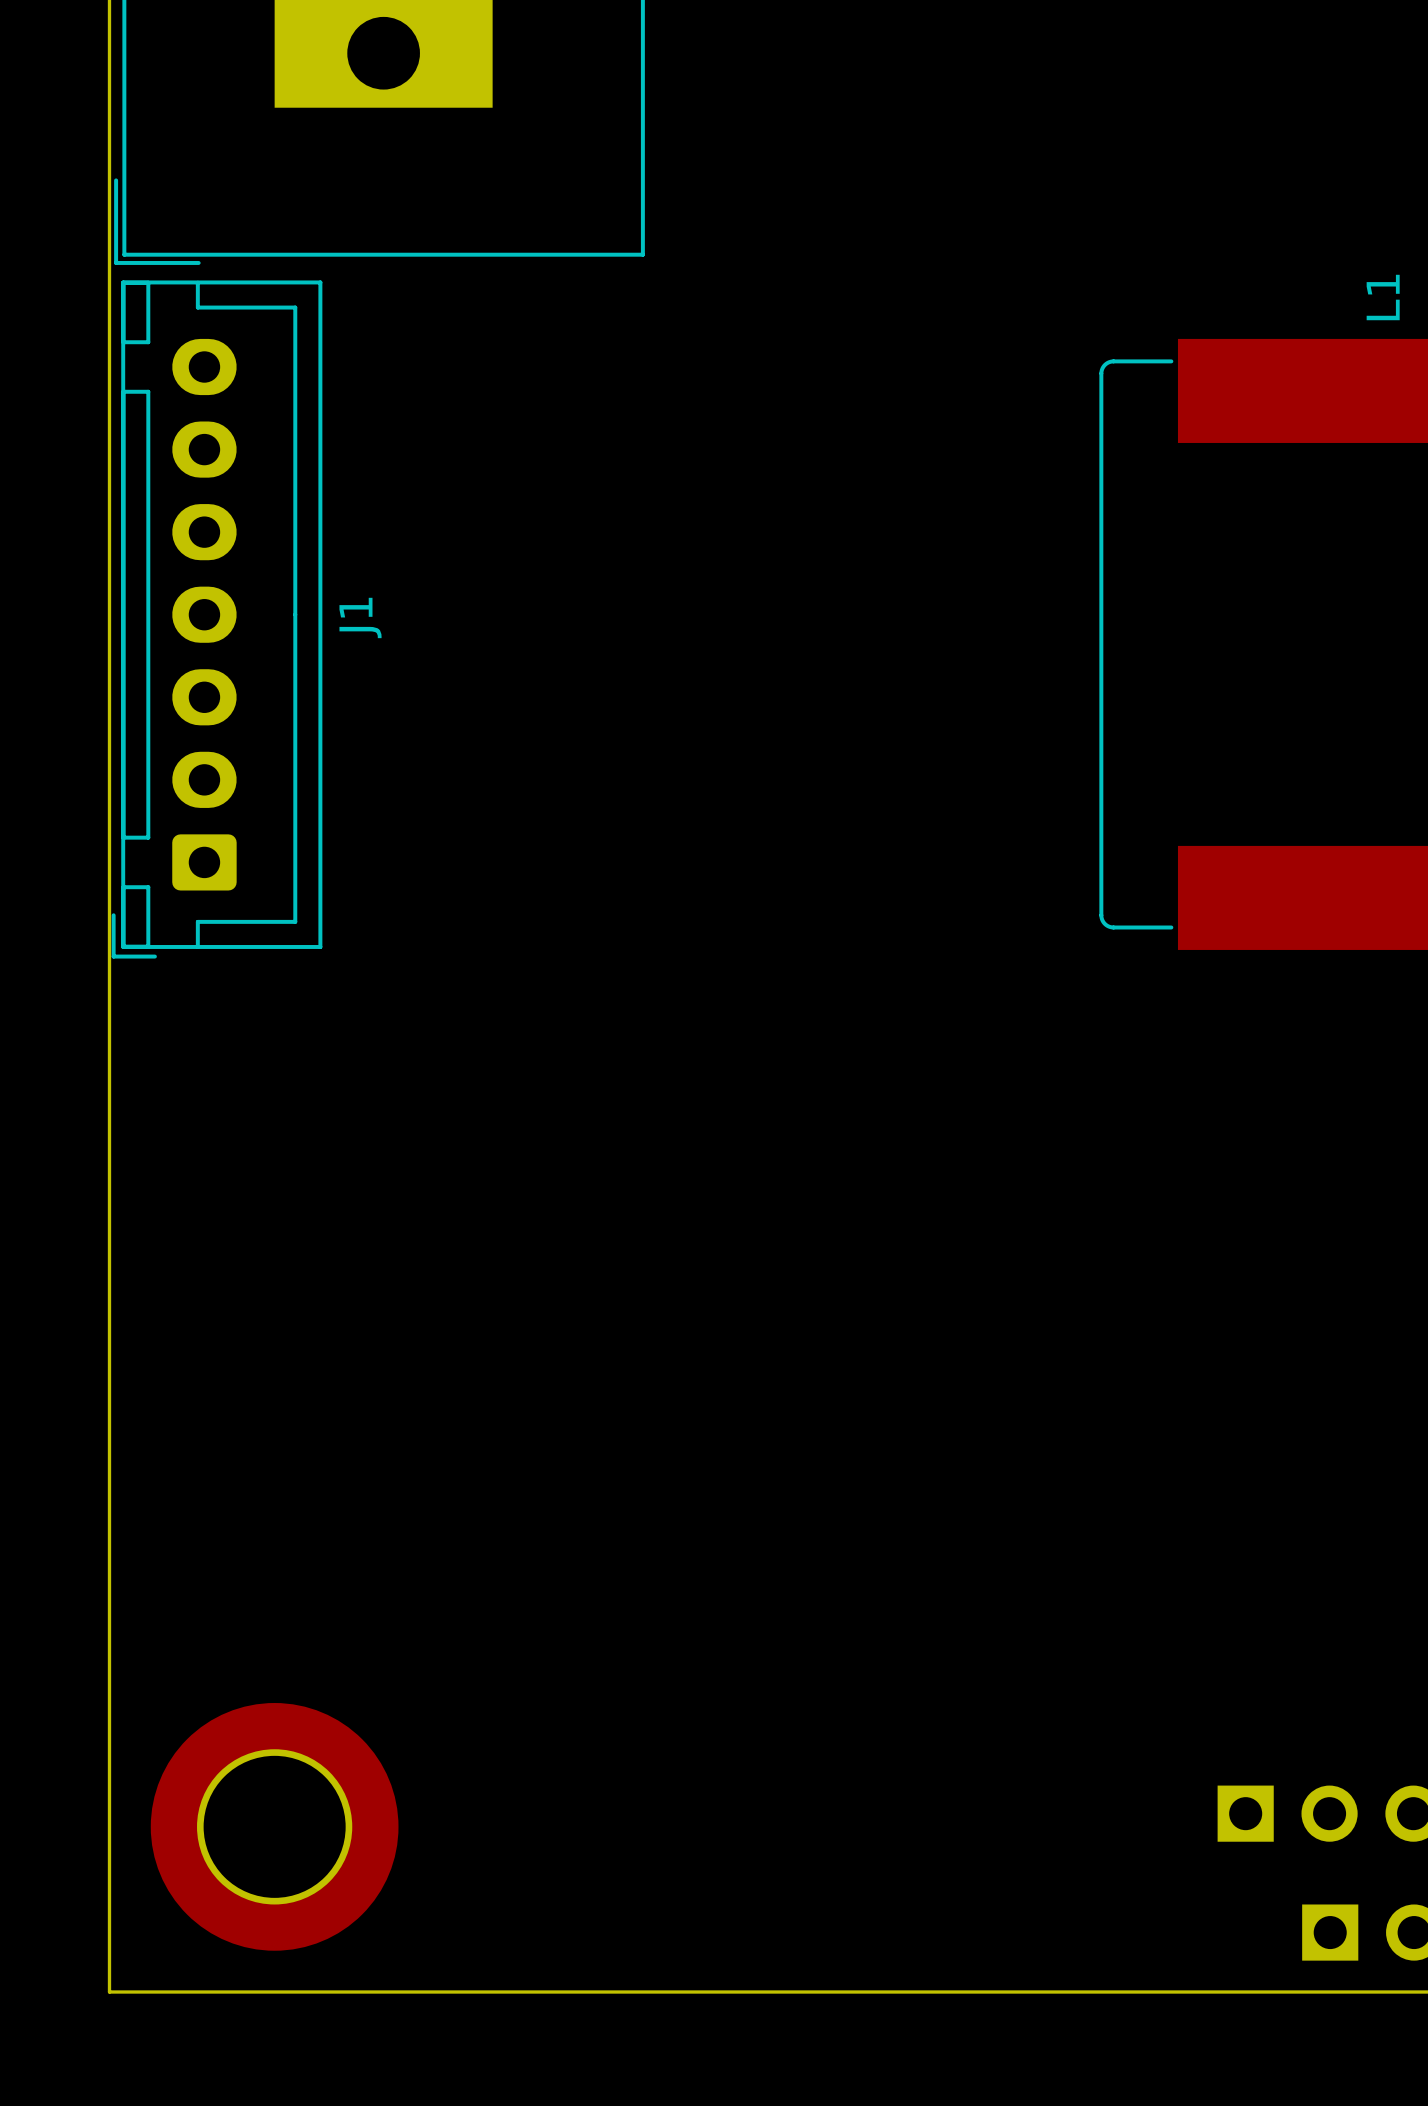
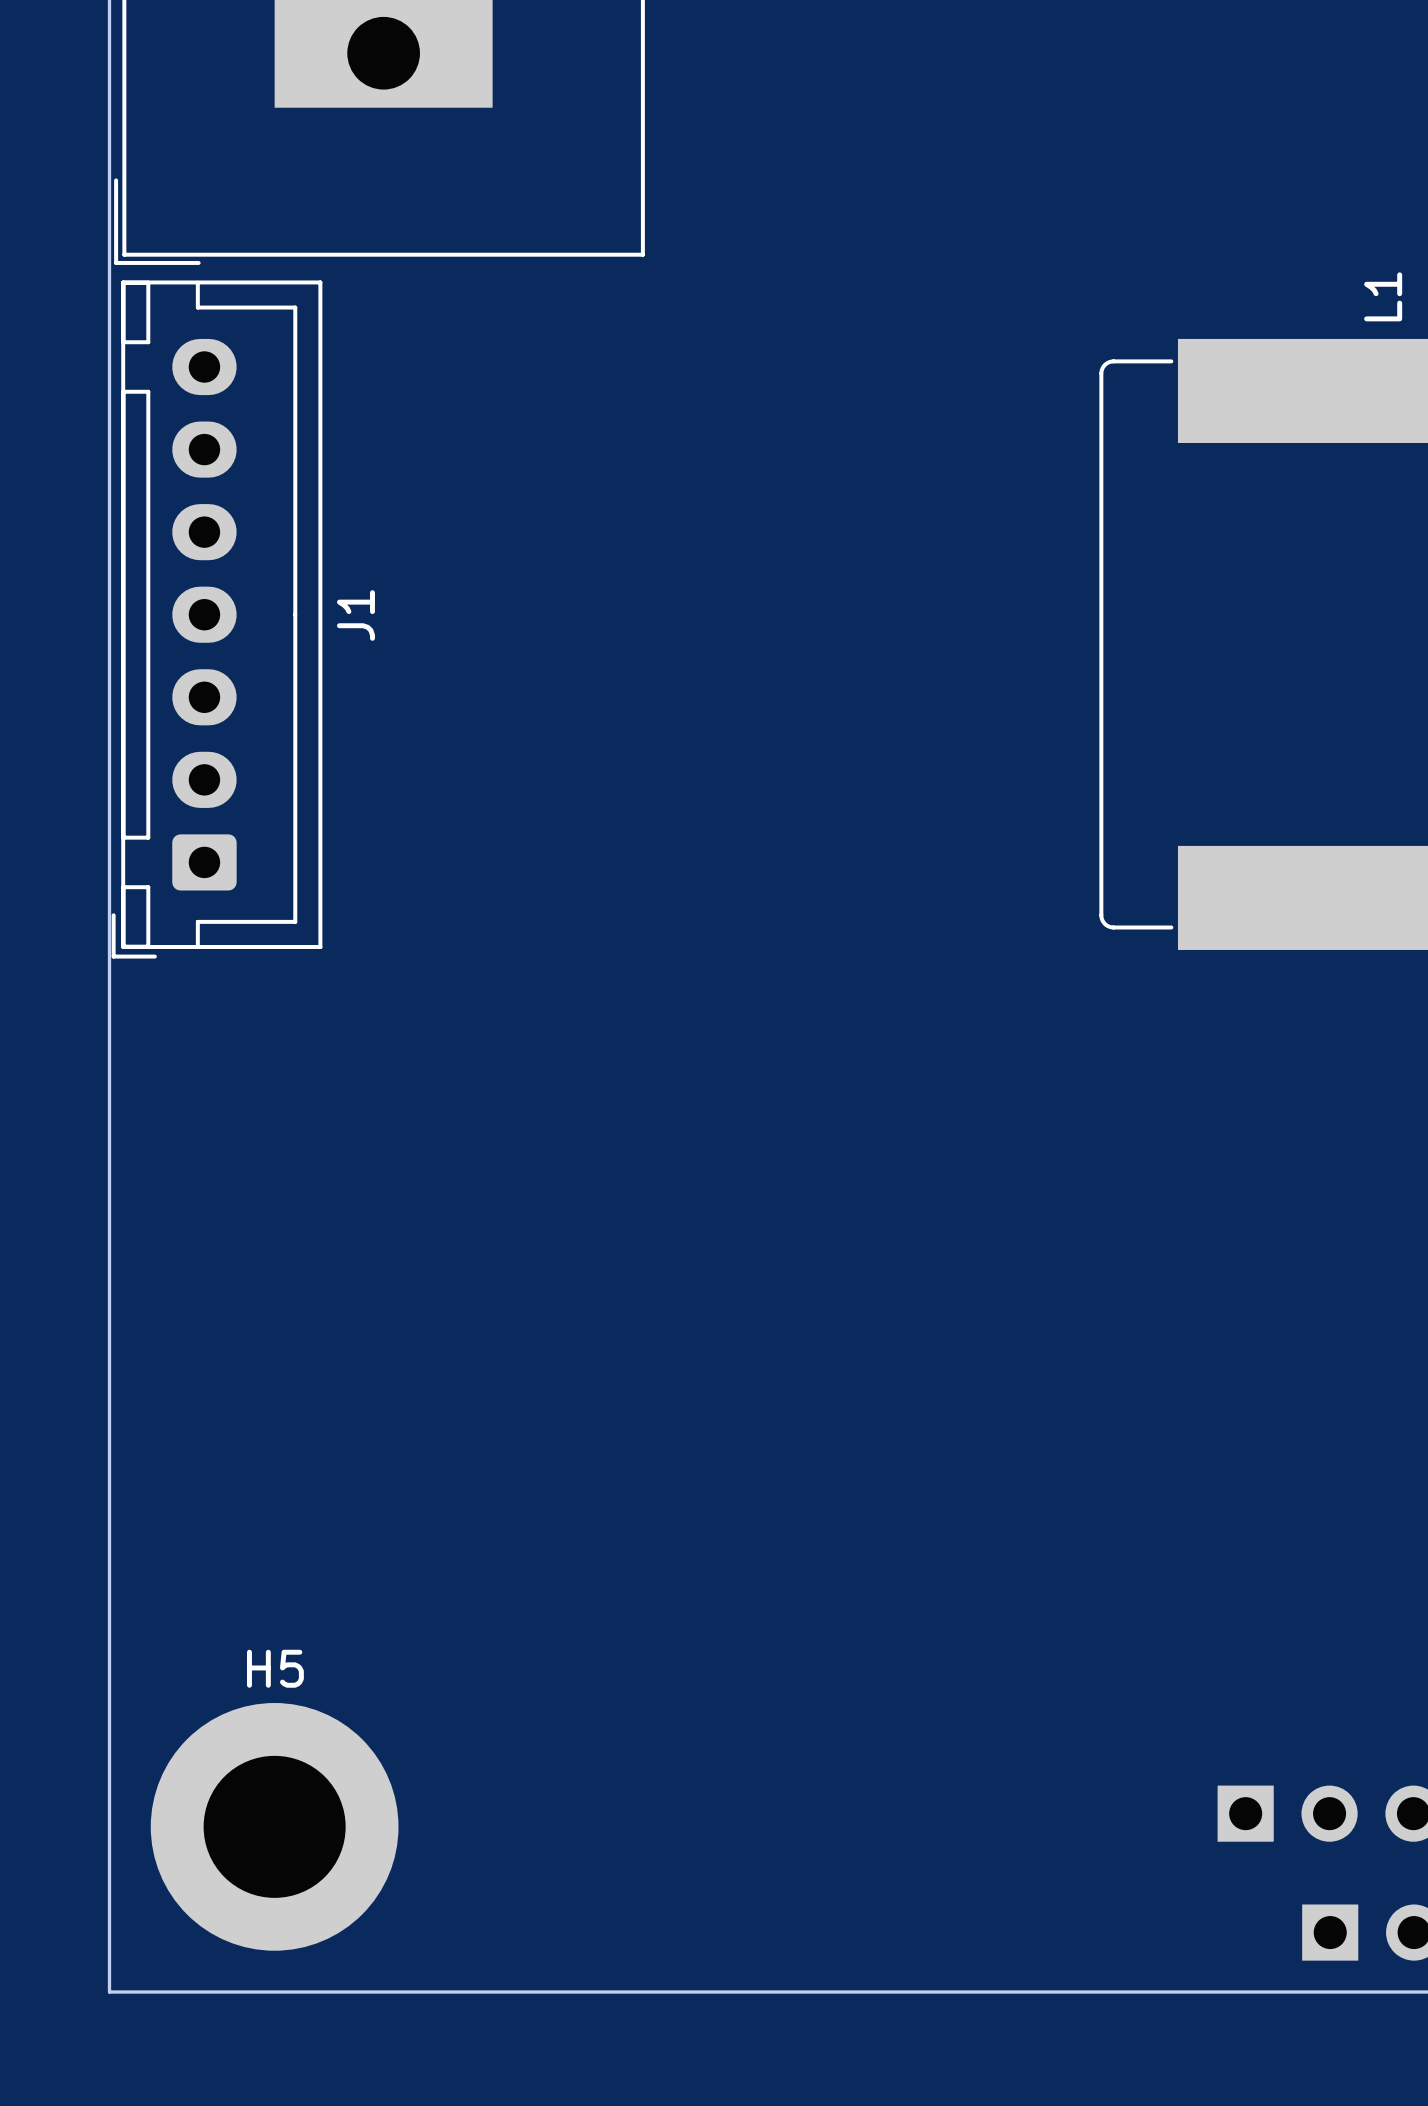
H5 name: none -> H5 (275, 1668)

